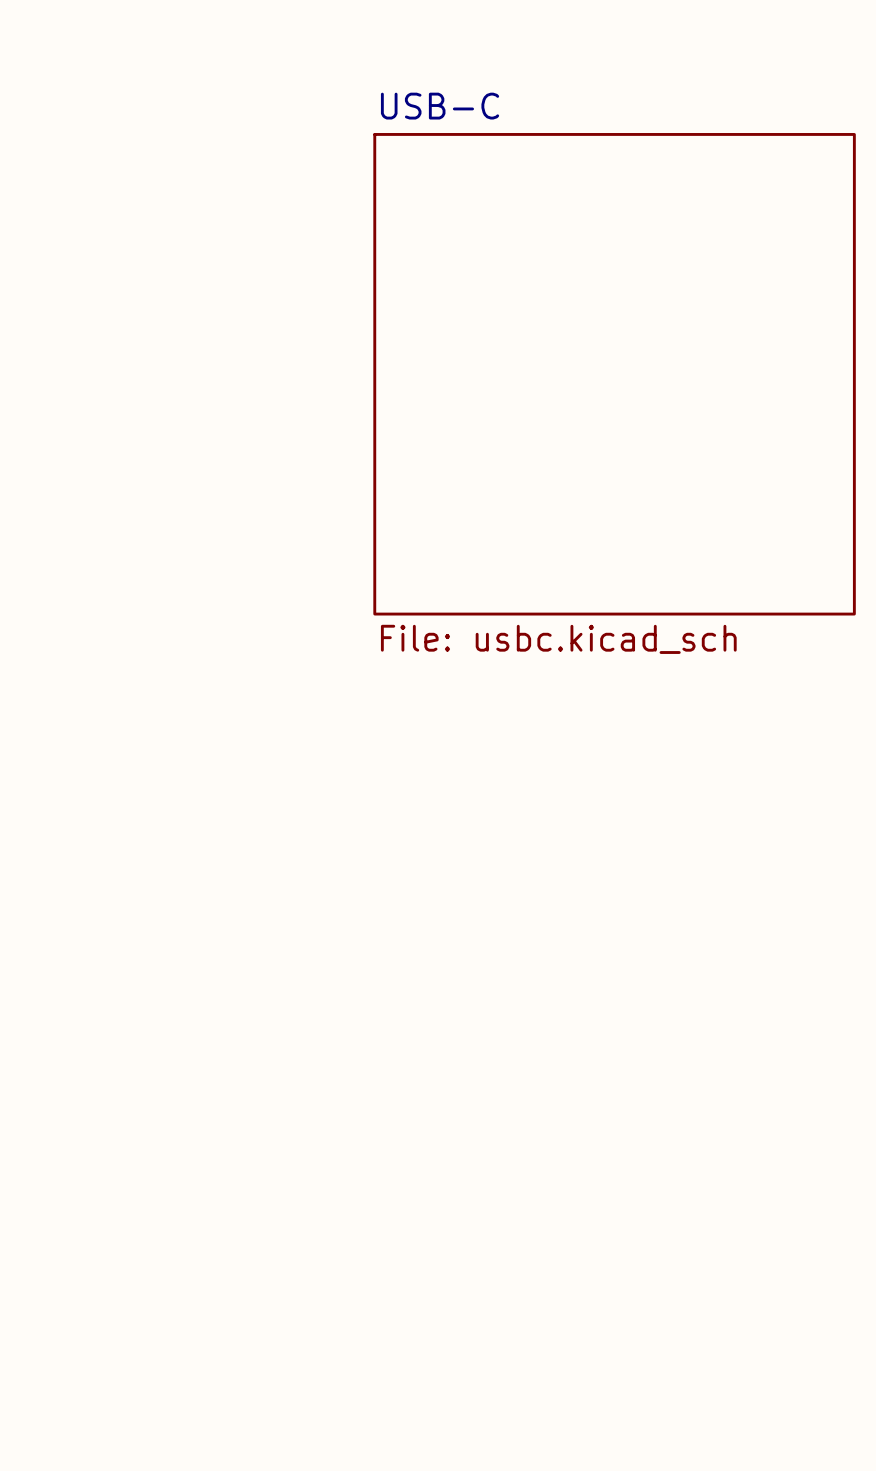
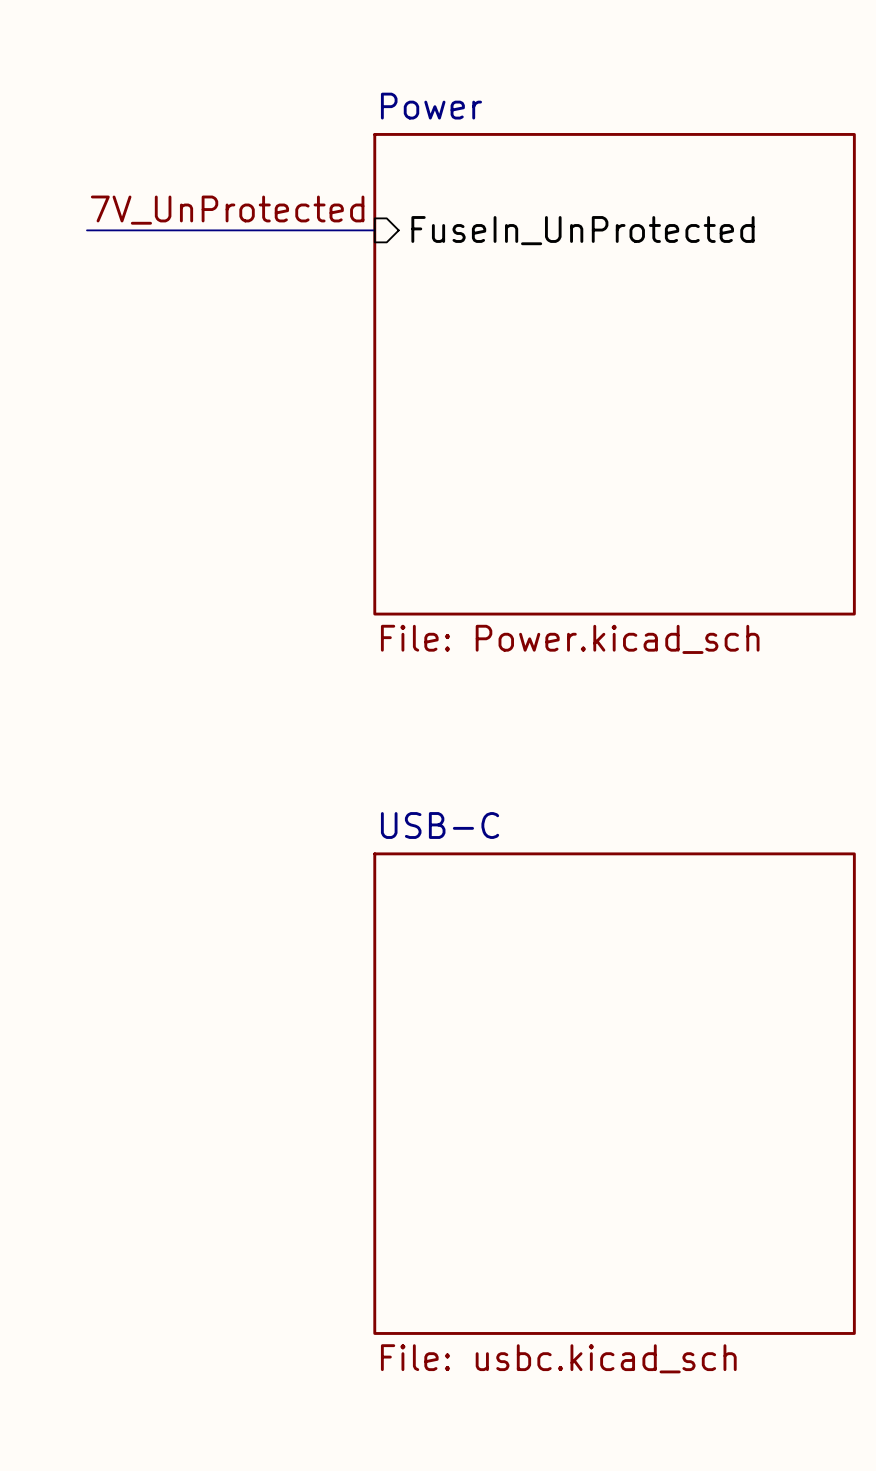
sheet USB-C name: USB-C (440, 106) -> Power (431, 106)
label: none -> 7V_UnProtected (227, 210)
wire: none -> (87, 230) (374, 230)
sheet pin: none -> FuseIn_UnProtected (582, 230)
sheet USB-C value: File: usbc.kicad_sch (558, 639) -> File: Power.kicad_sch (570, 639)
sheet USB-C: none -> File: usbc.kicad_sch (614, 1093)

